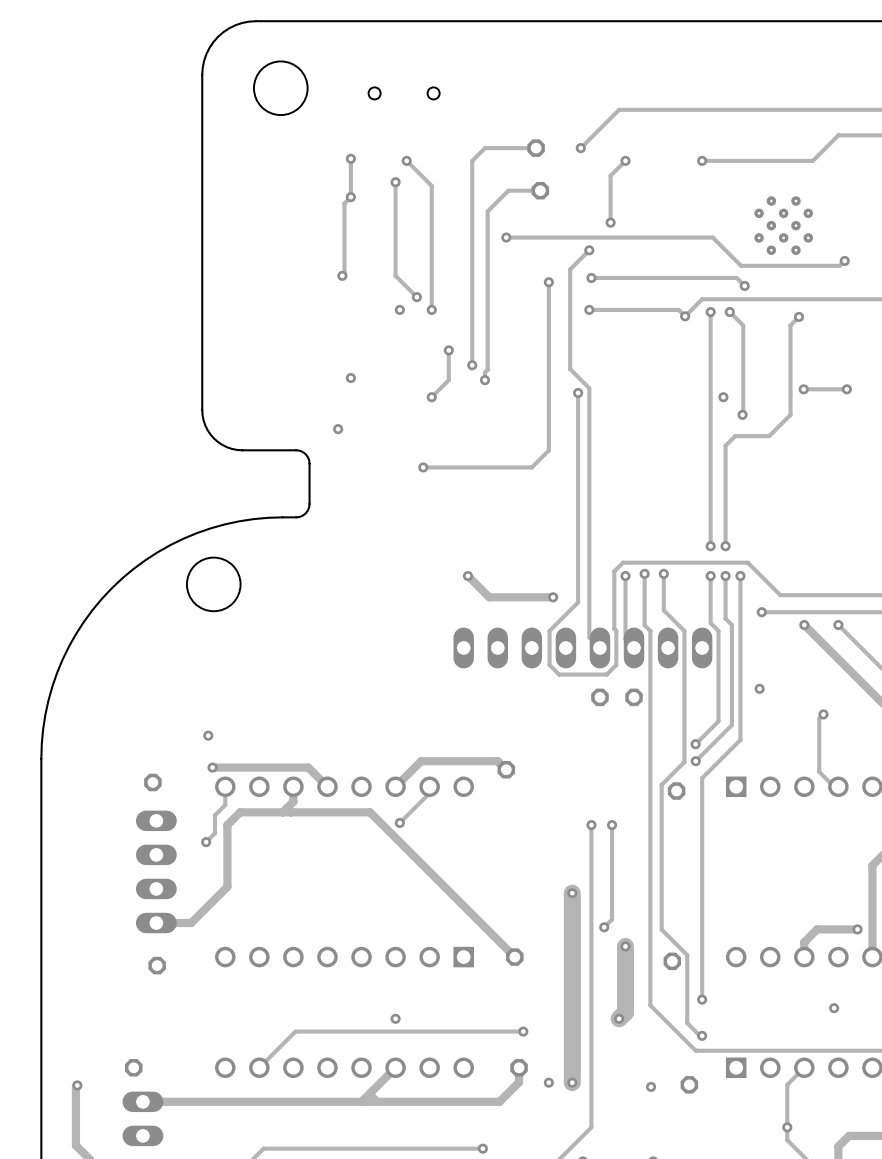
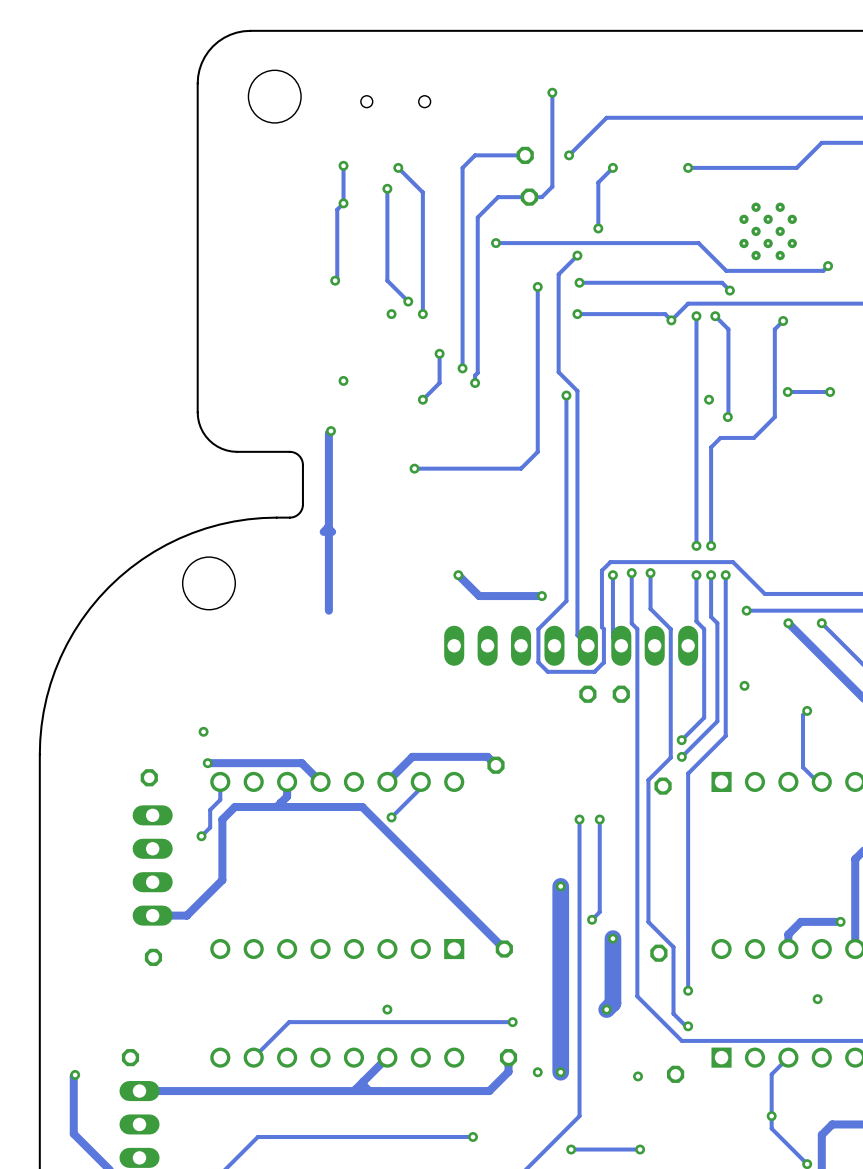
track: none -> (552, 92) (552, 186) (541, 197) (529, 197)
via: none -> (552, 92)
track: none -> (330, 431) (328, 433) (328, 610)
track: none -> (334, 531) (327, 527) (323, 531)

